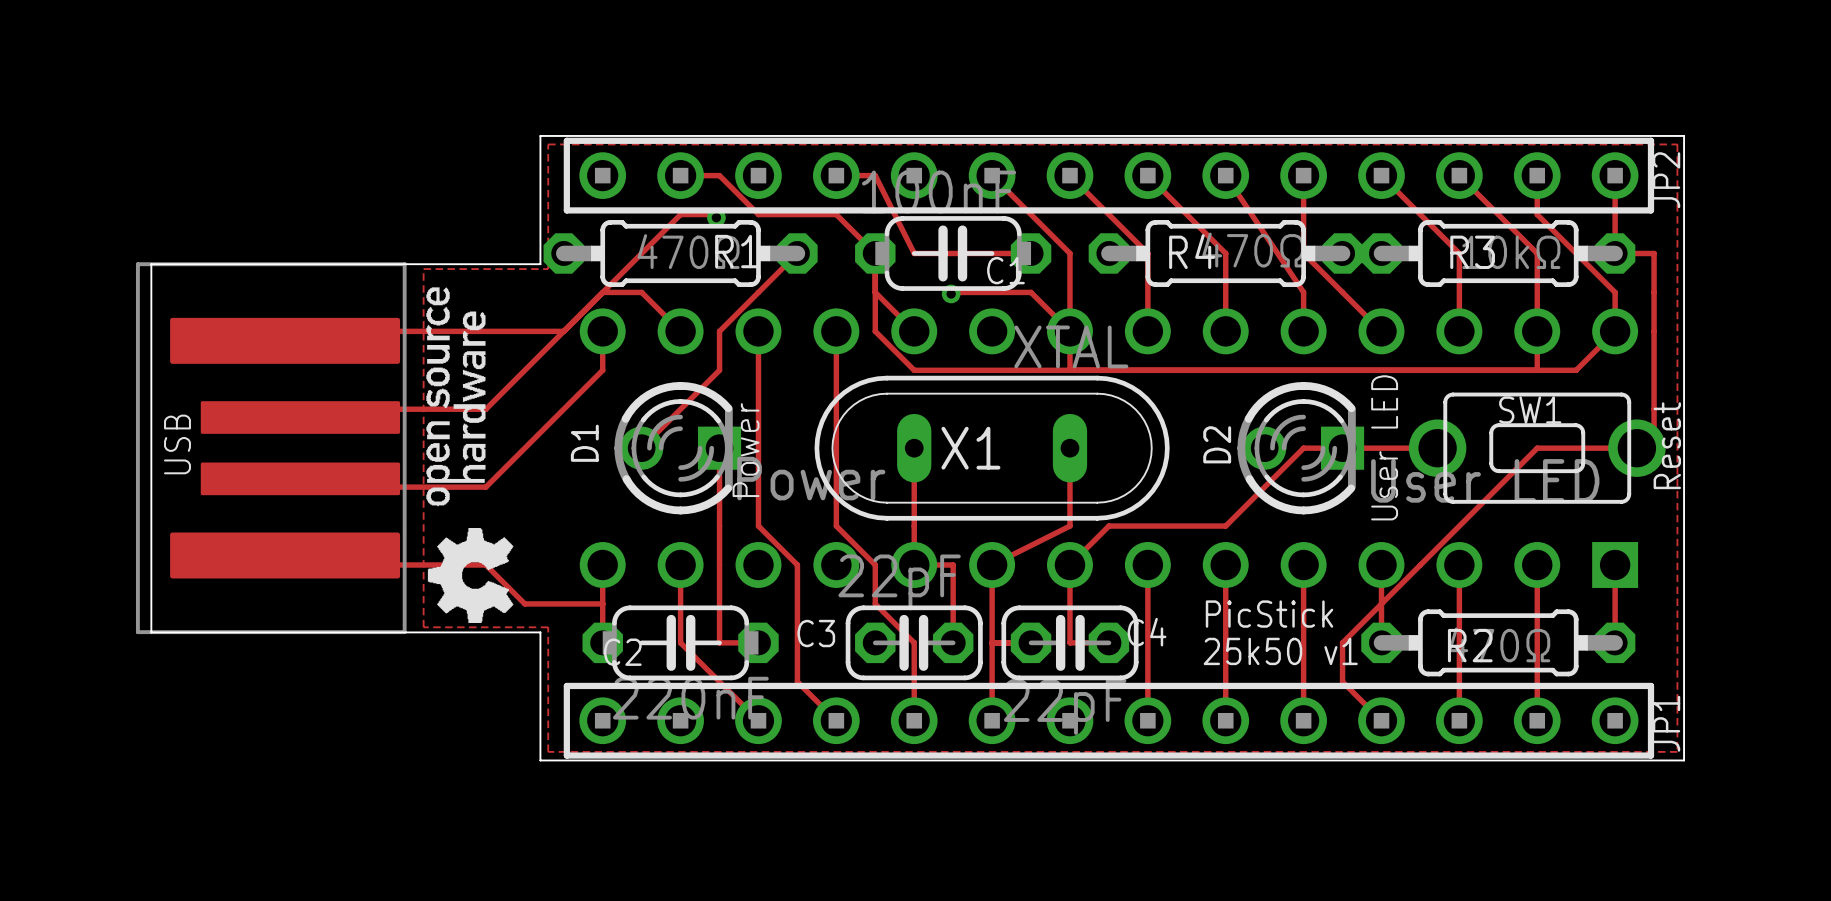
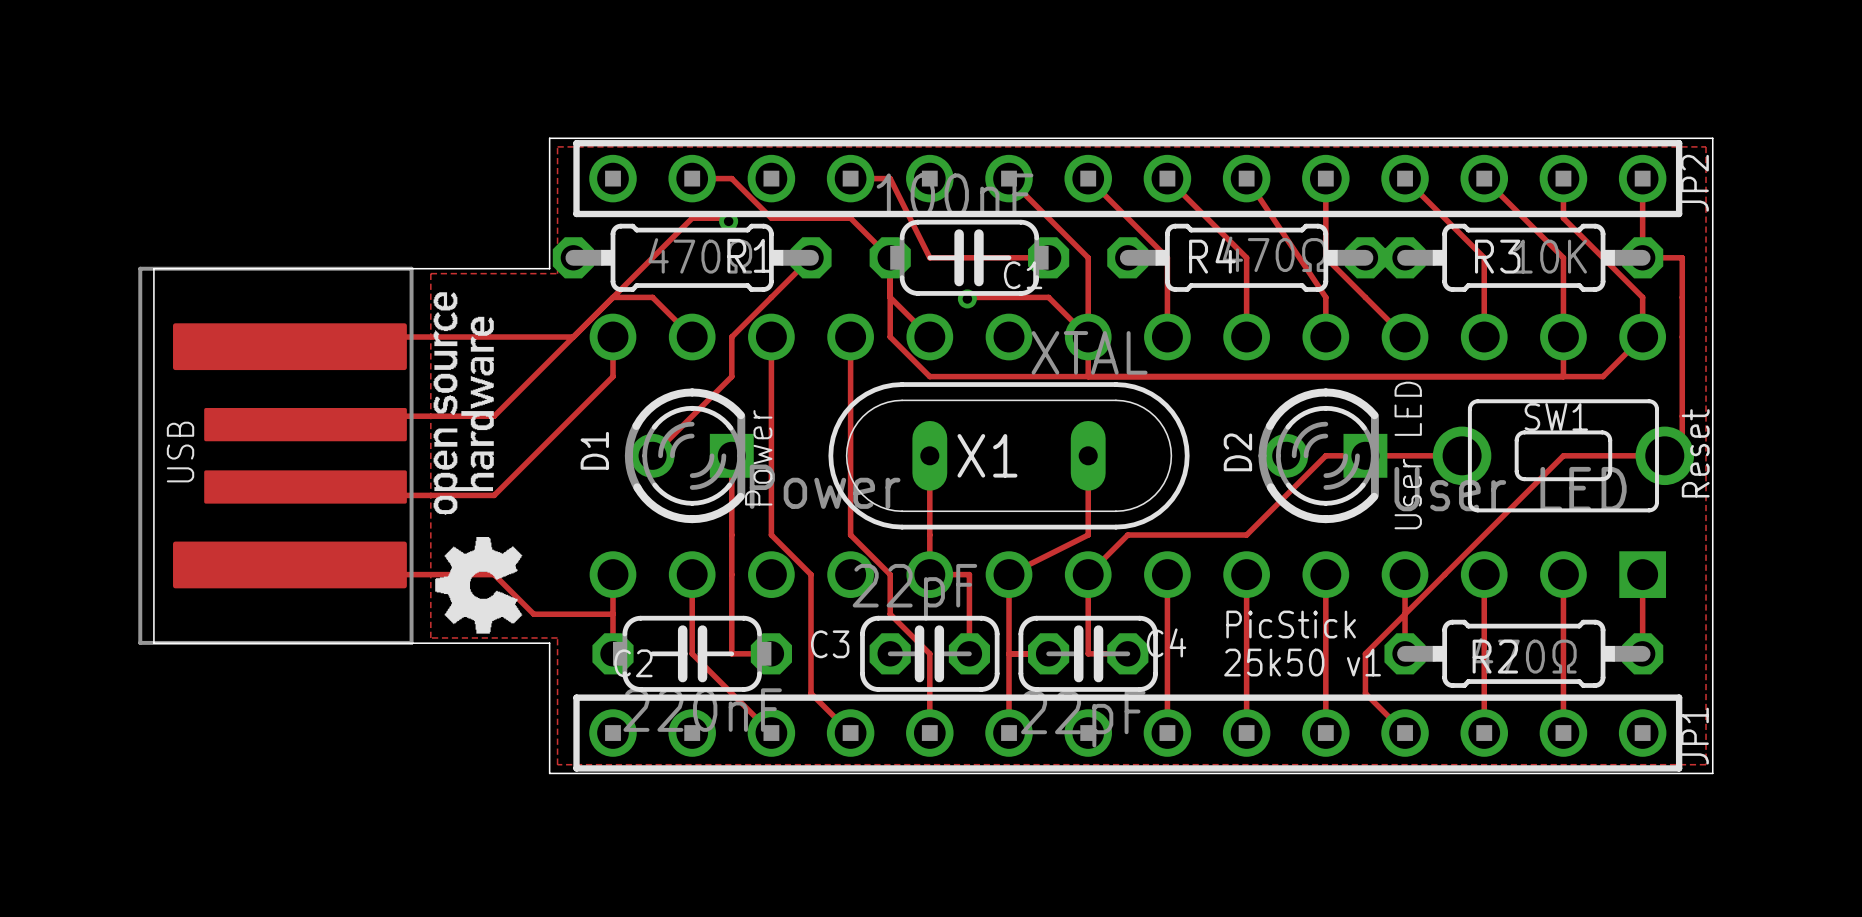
R3 value: 10kΩ (1511, 252) -> 10K (1550, 256)

